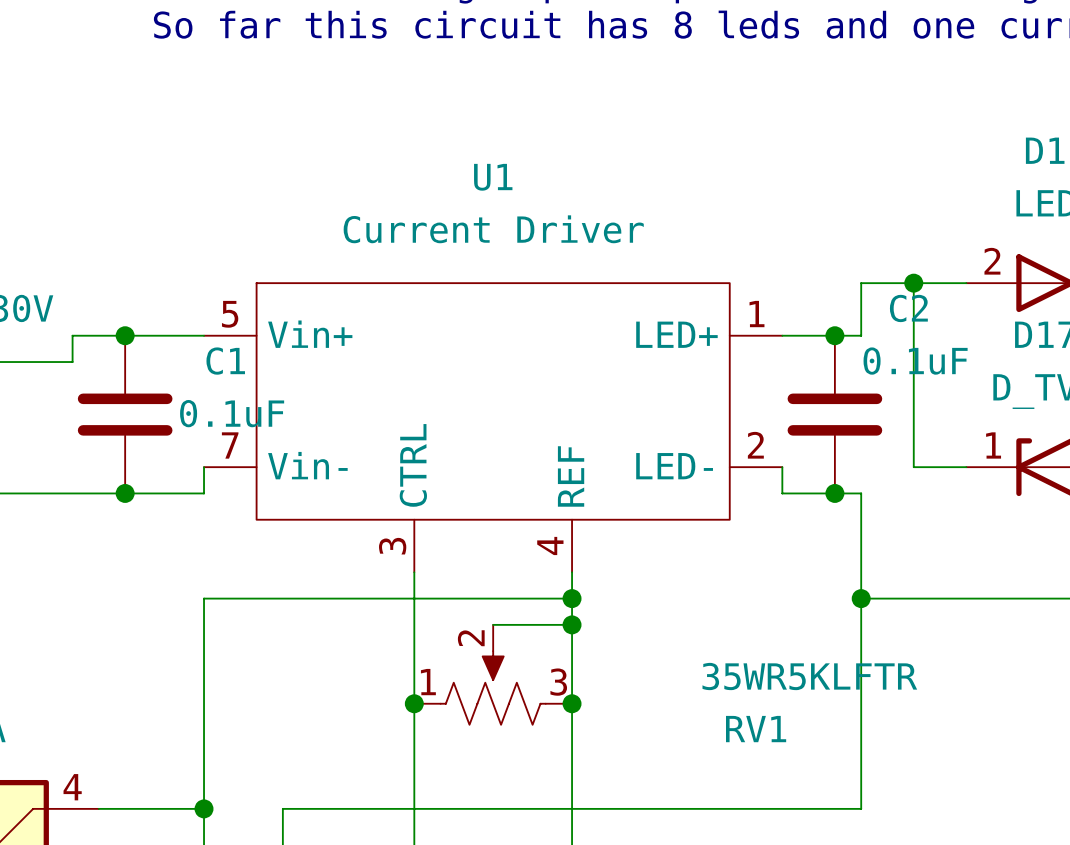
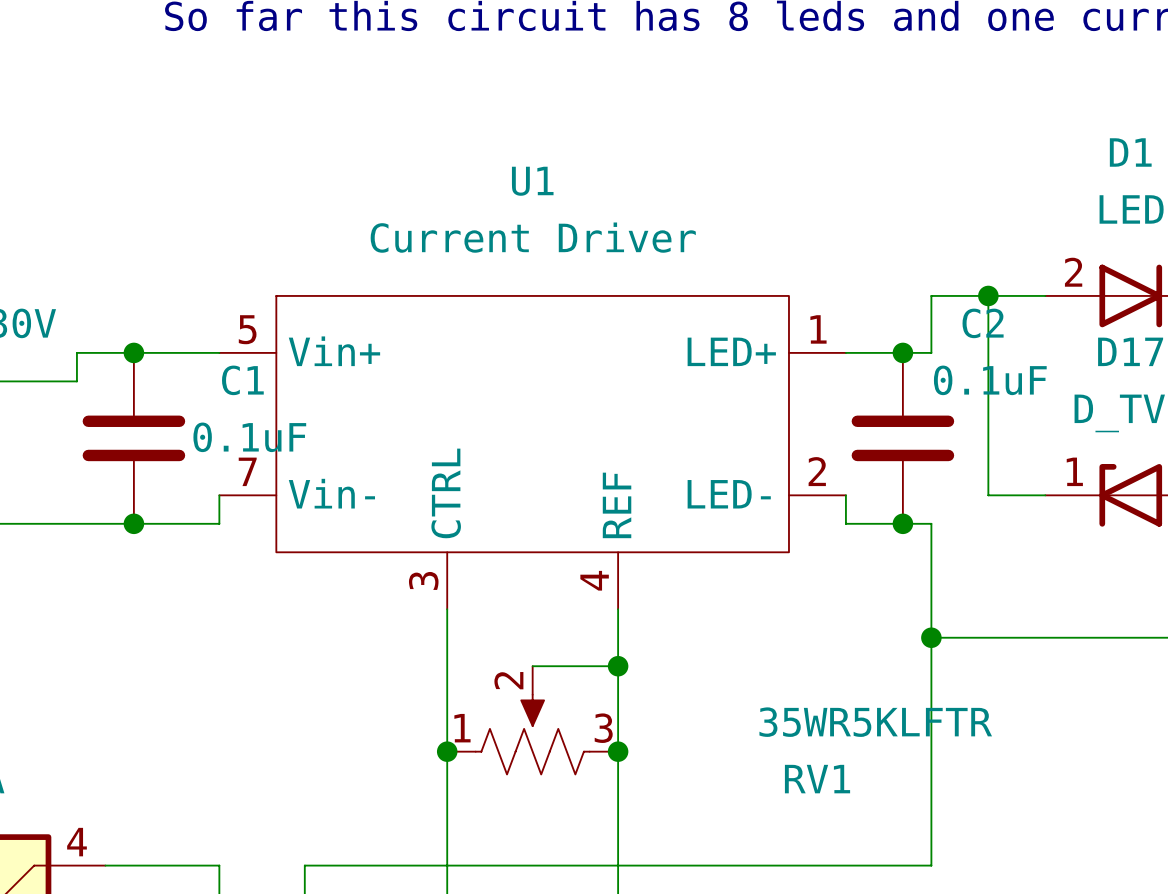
wire: (572, 598) (204, 598) (204, 808) -> none
junction: (572, 598) -> none
junction: (204, 808) -> none

